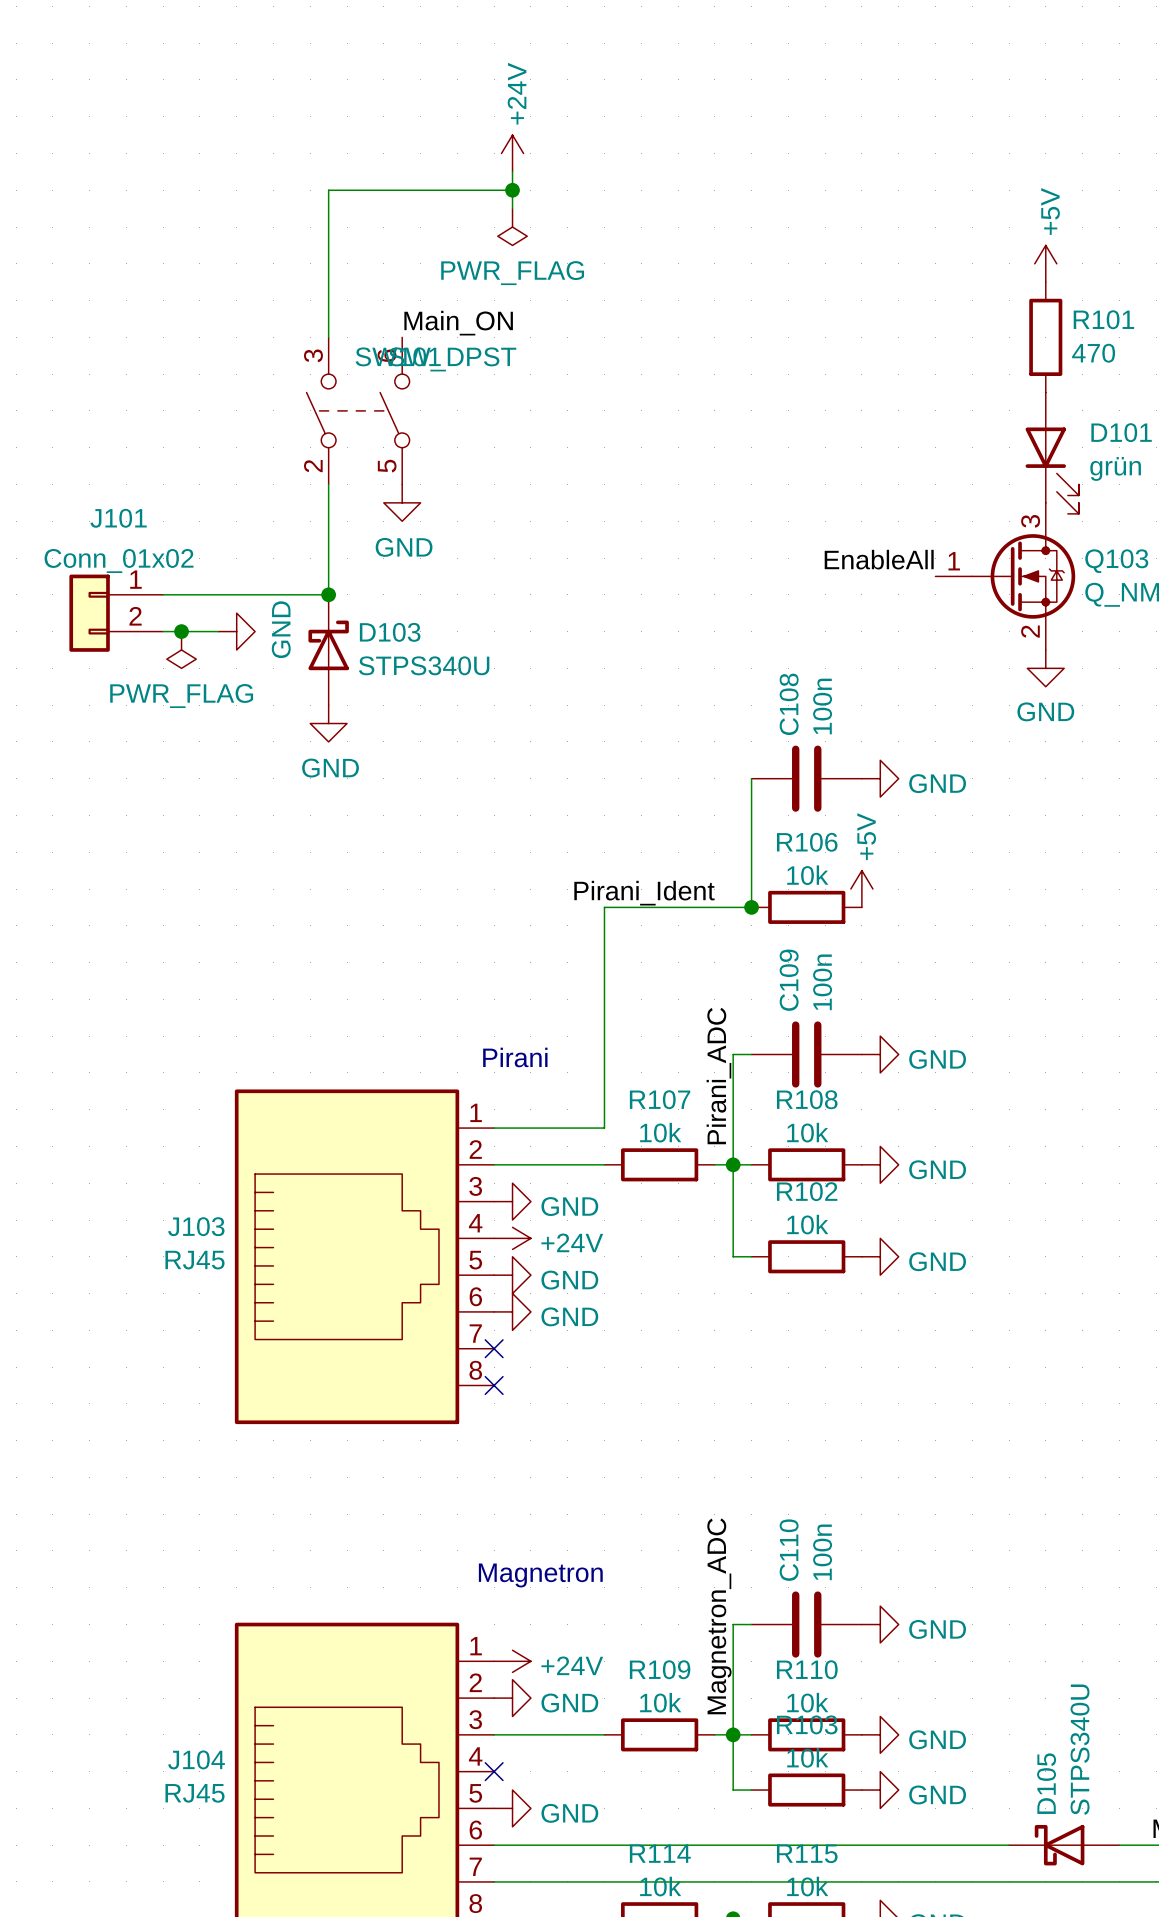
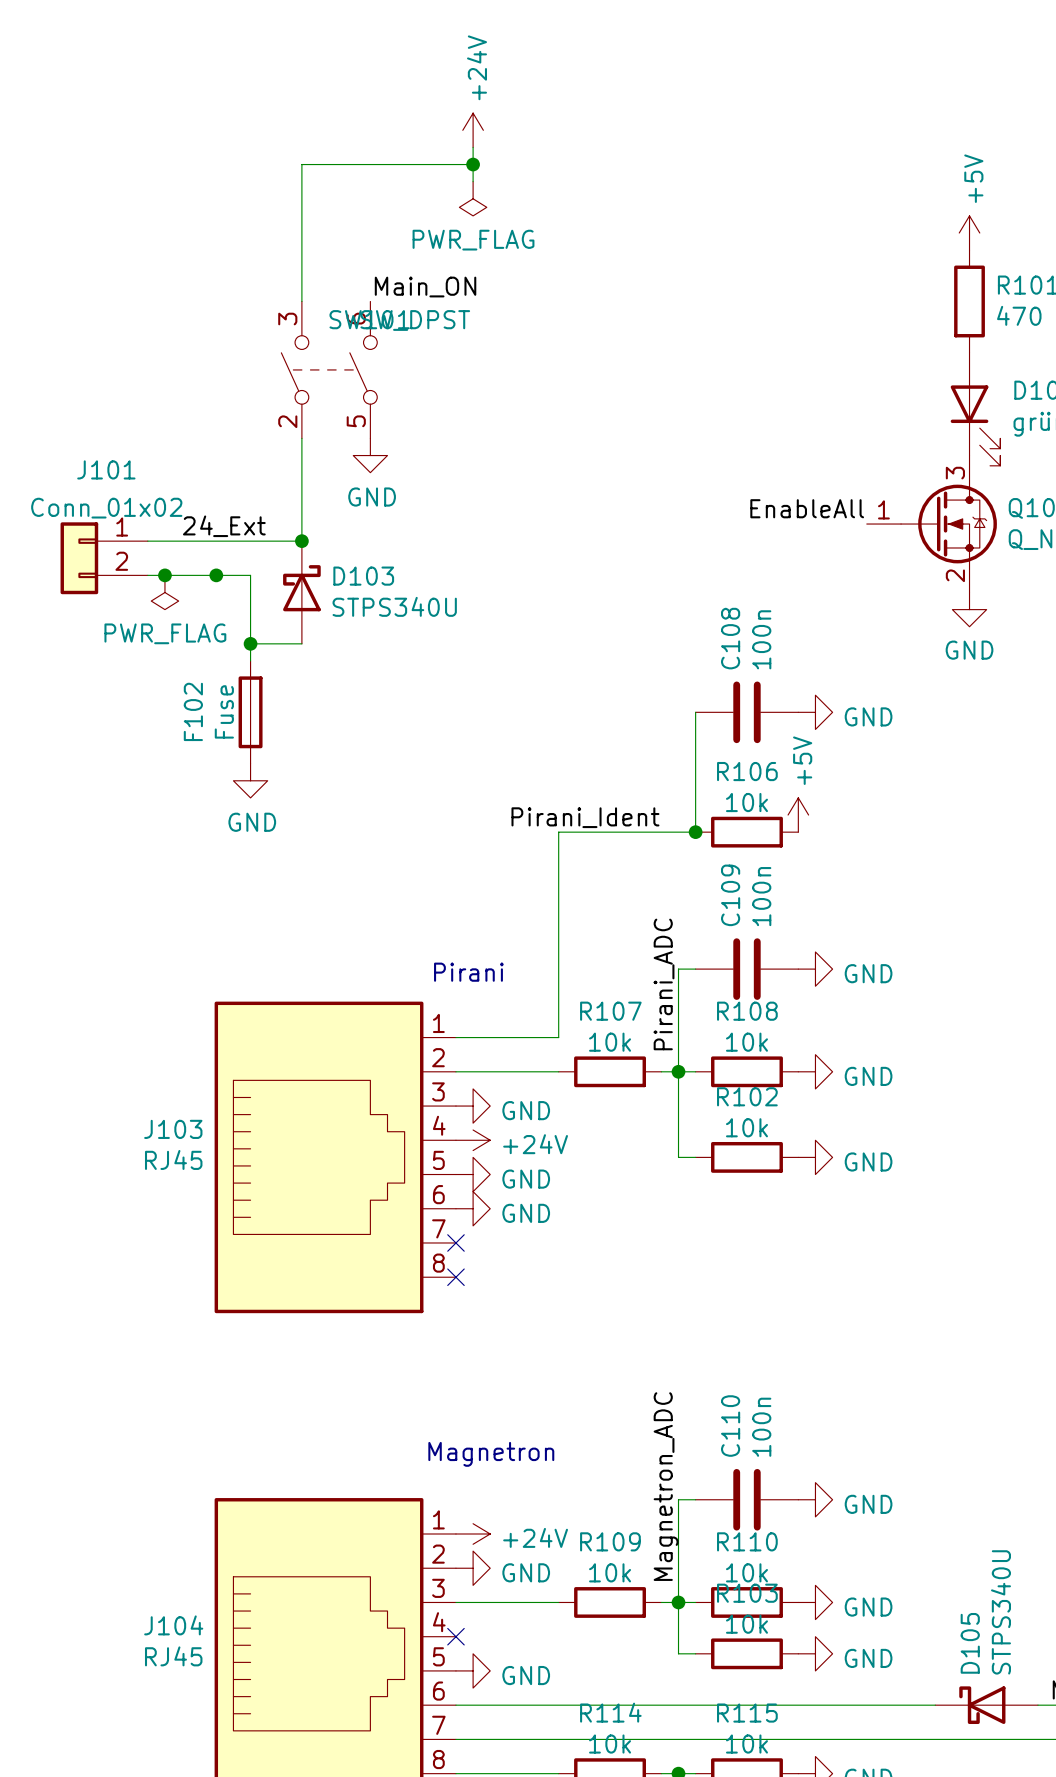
label: none -> 24_Ext (224, 526)
wire: none -> (199, 575) (250, 575) (250, 660)
power symbol: GND (236, 631) -> none
junction: none -> (216, 575)
wire: none -> (250, 643) (301, 643)
junction: none -> (250, 643)
power symbol: GND (328, 723) -> none
F102: none -> Fuse (250, 712)
power symbol: none -> GND (250, 780)

